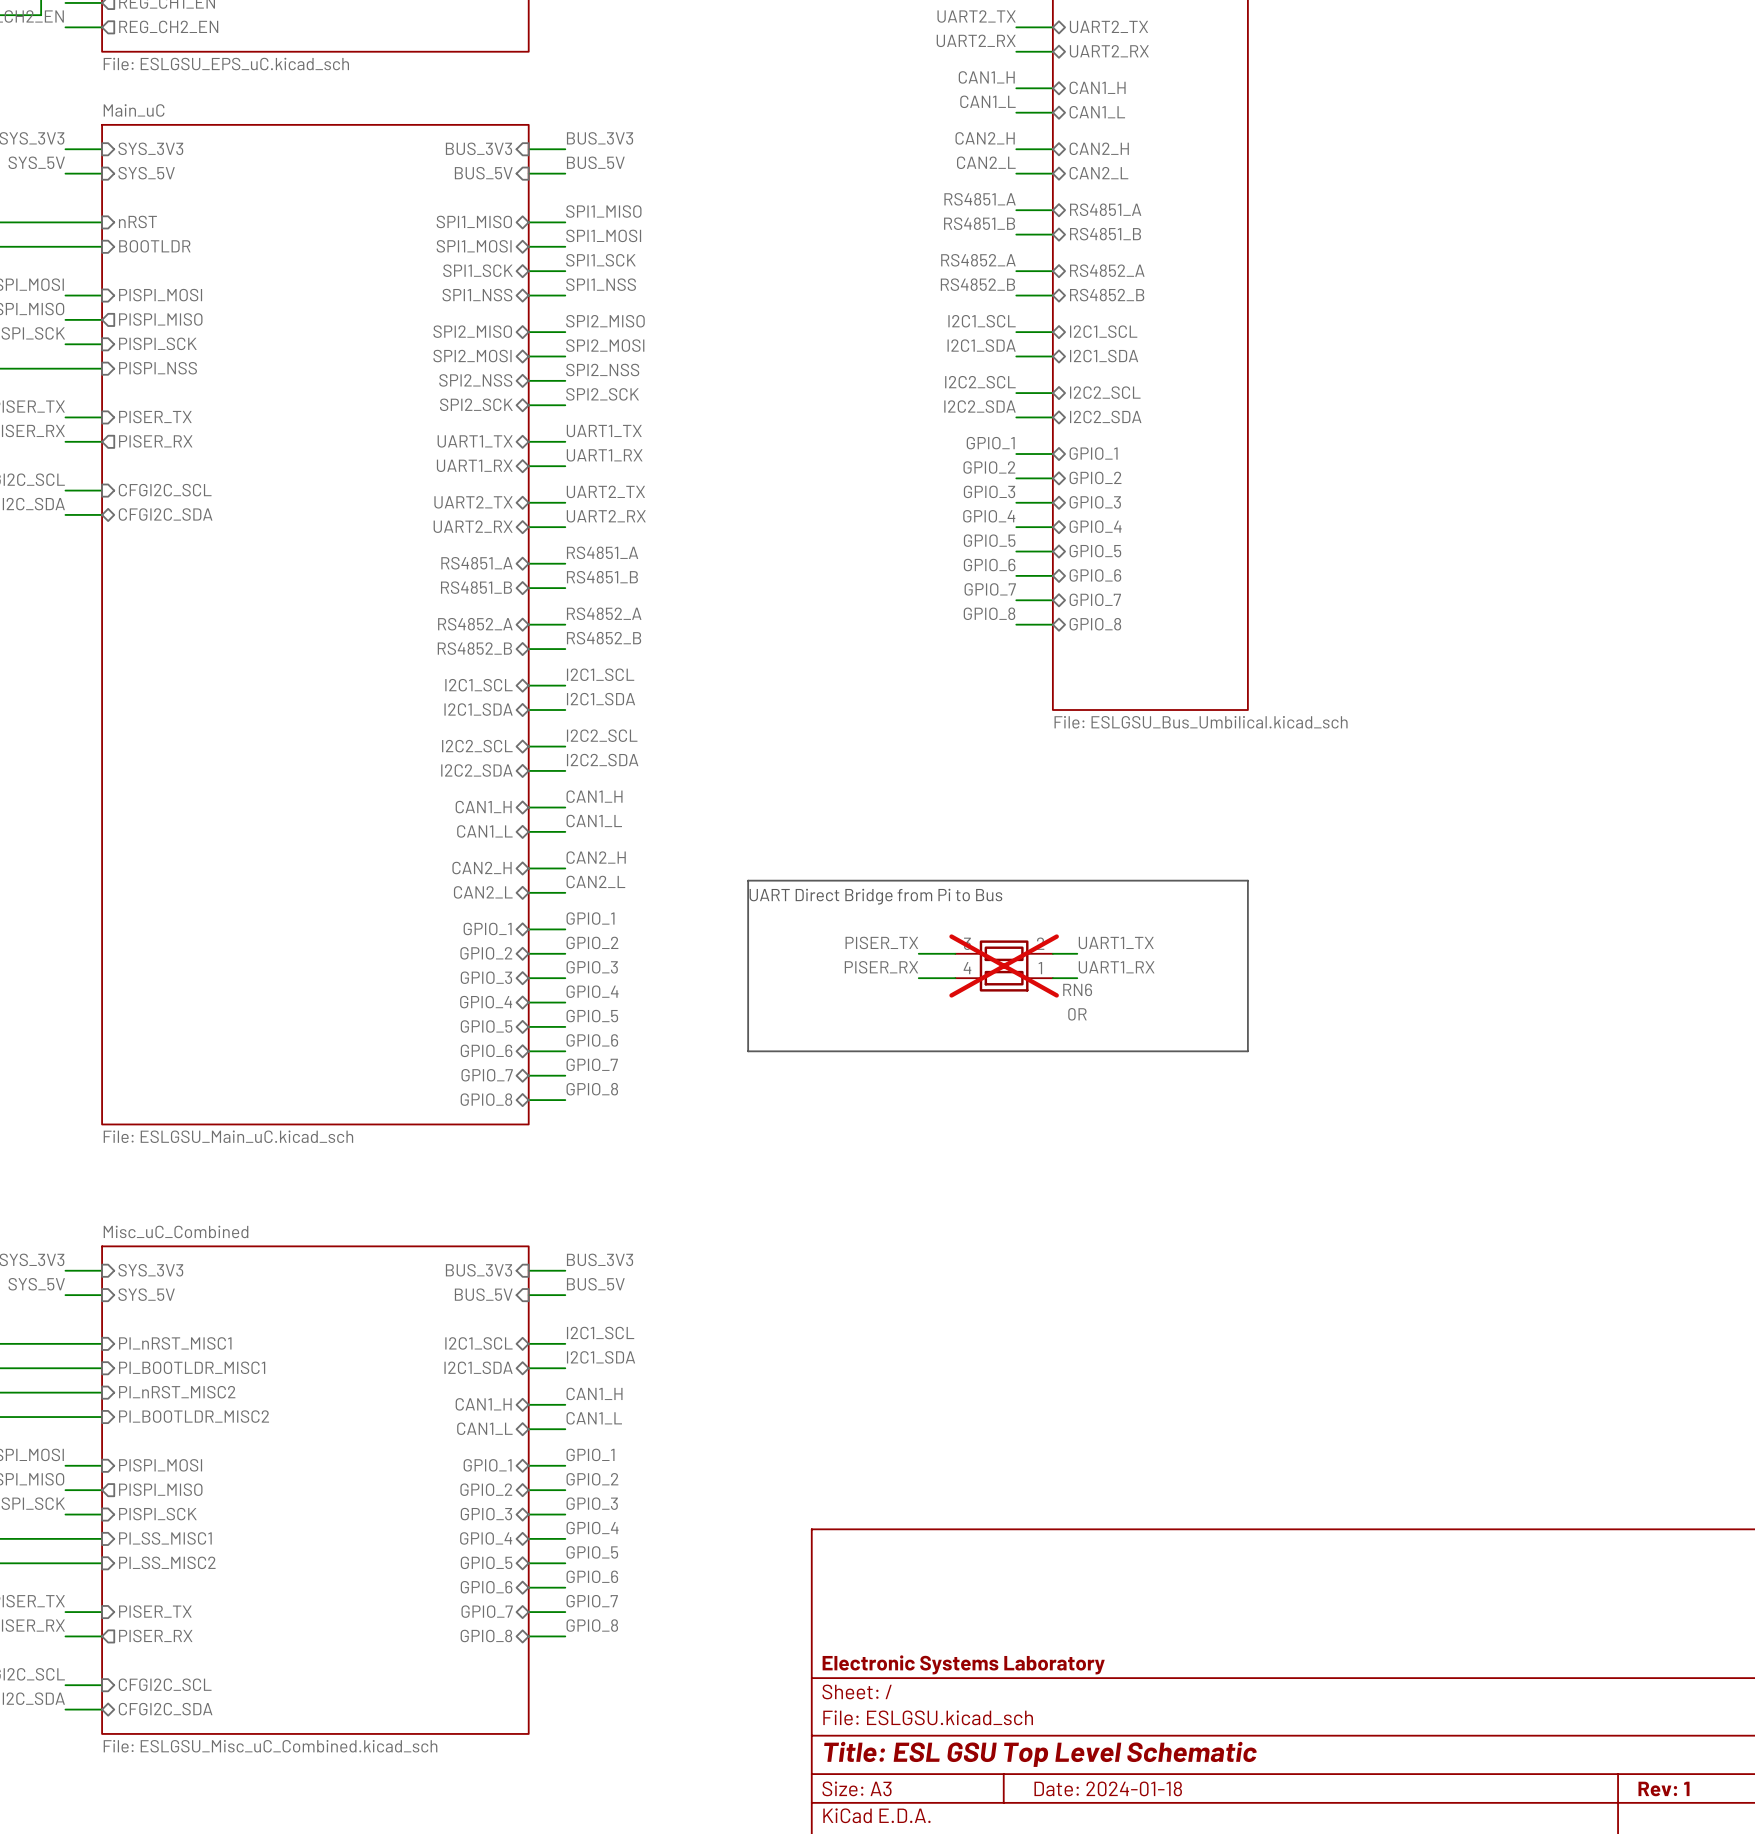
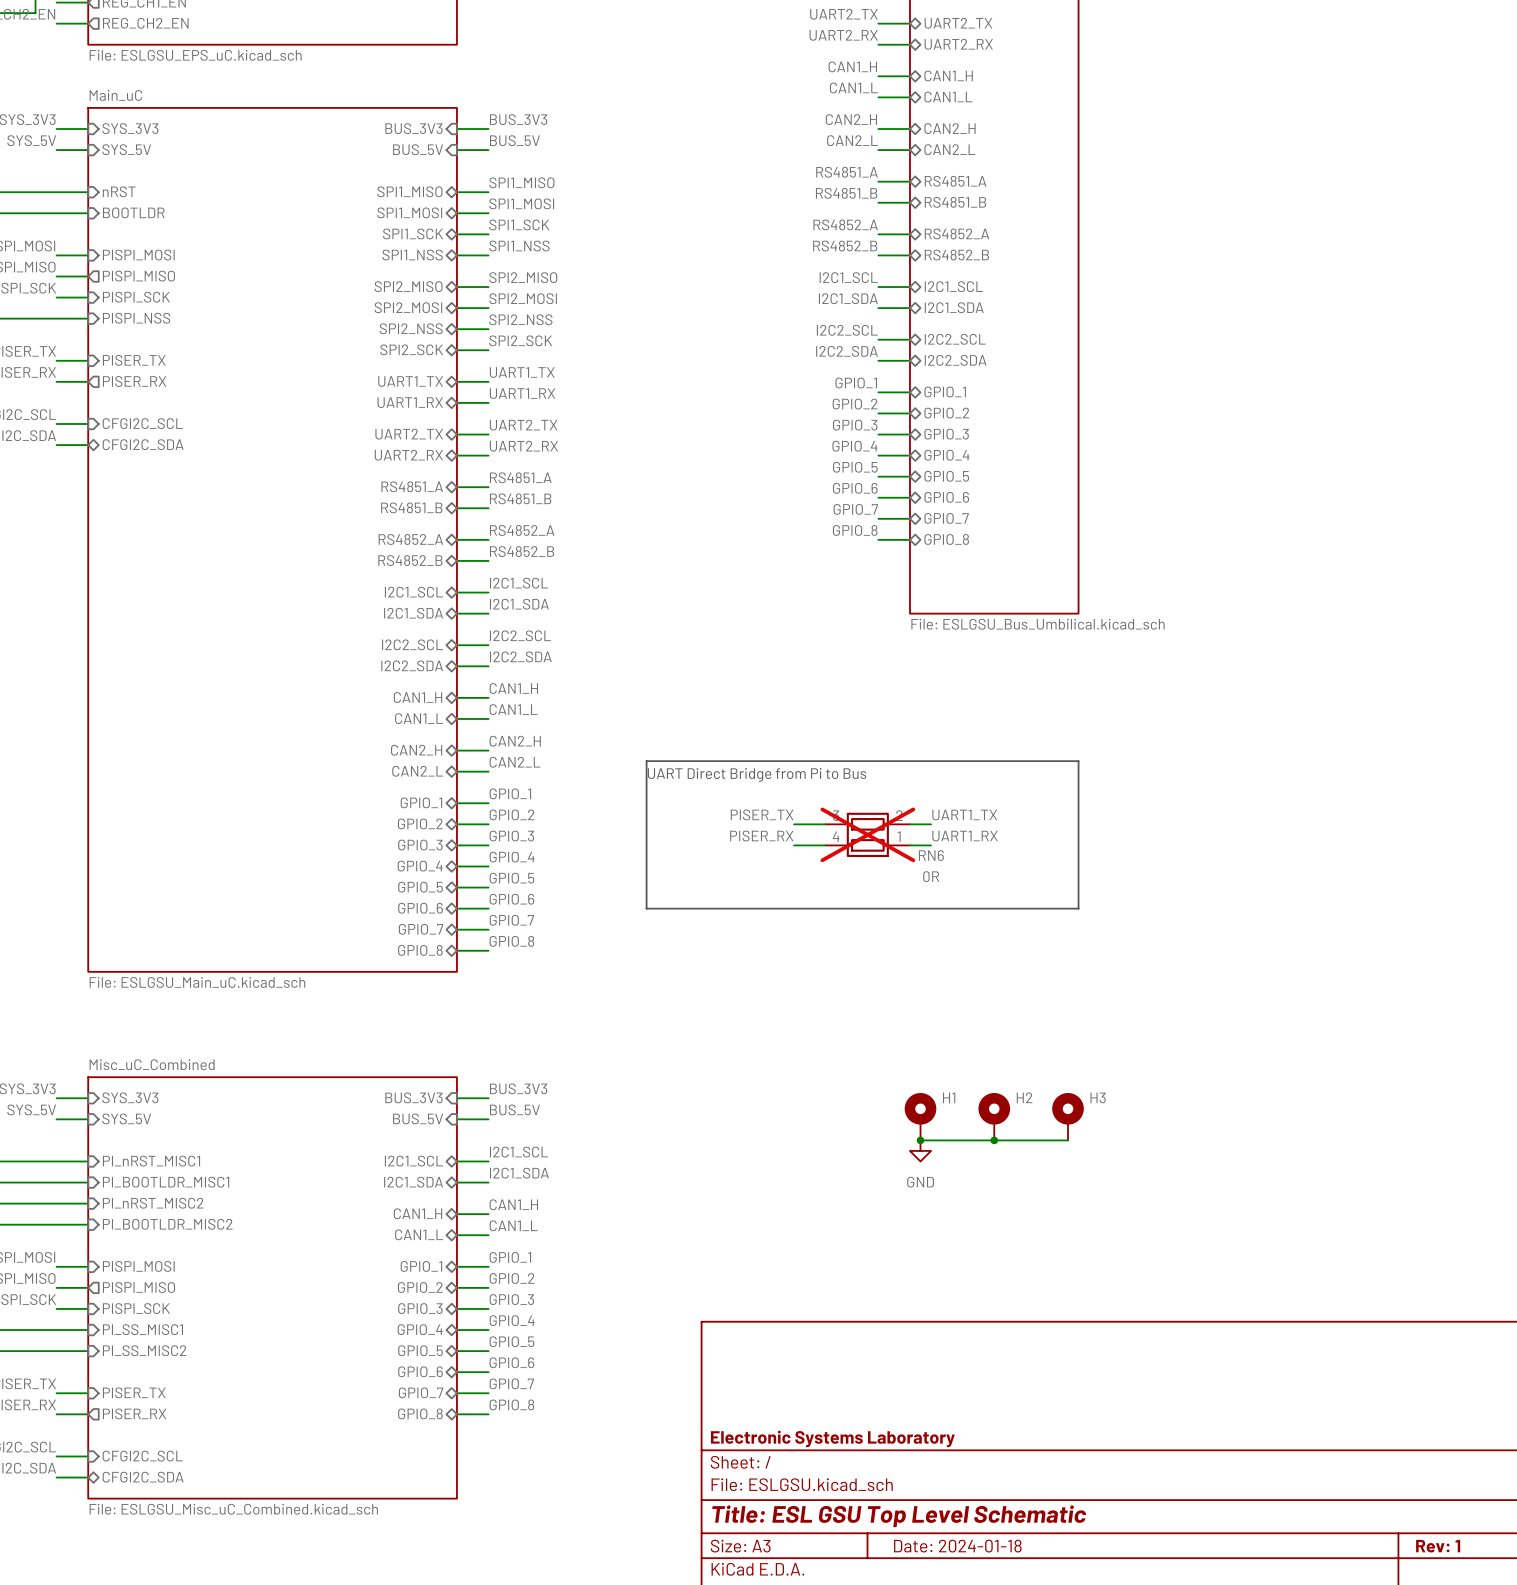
H1: none -> (920, 1116)
H2: none -> (994, 1116)
H3: none -> (1068, 1116)
wire: none -> (920, 1140) (1068, 1140)
junction: none -> (920, 1140)
junction: none -> (994, 1140)
power symbol: none -> GND (920, 1150)

